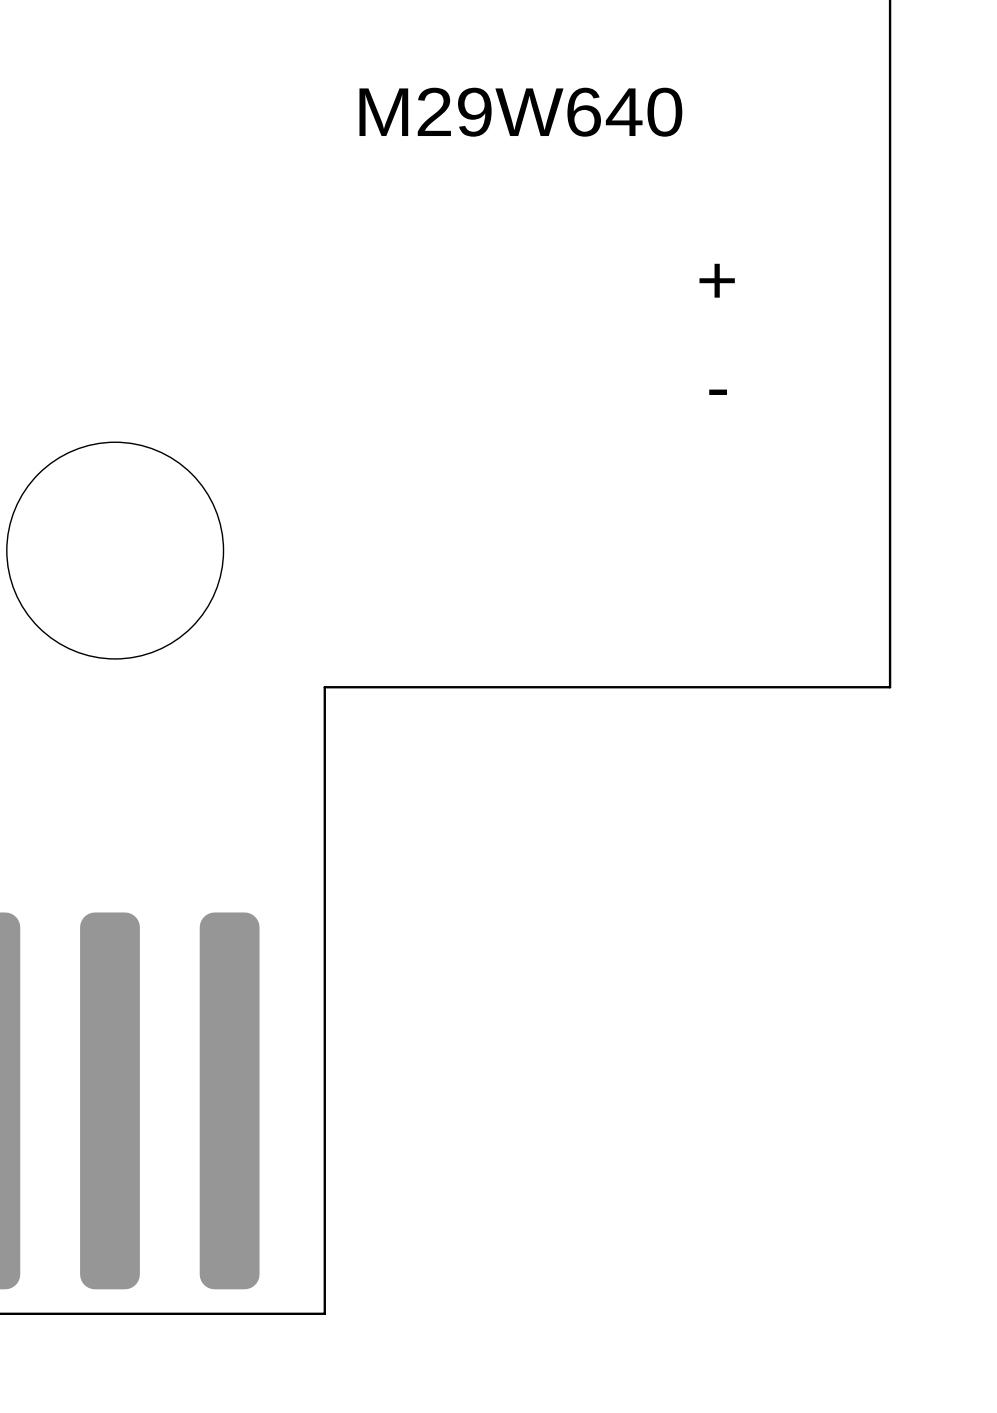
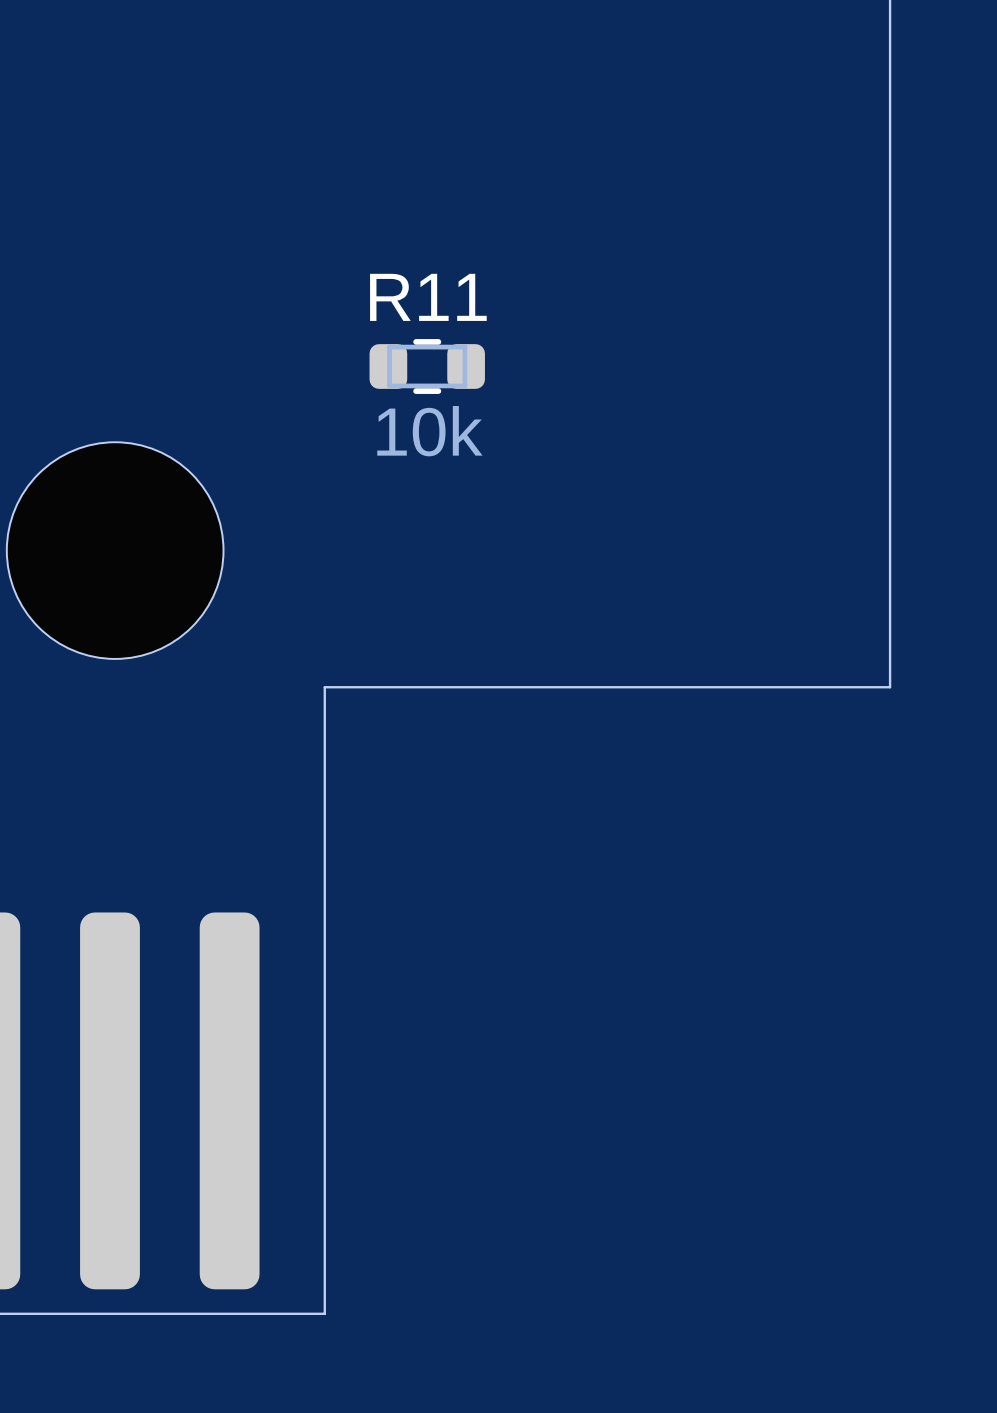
text: M29W640 (520, 112) -> none
text: + (717, 280) -> none
R11: none -> 10k (427, 366)
text: - (718, 392) -> none

